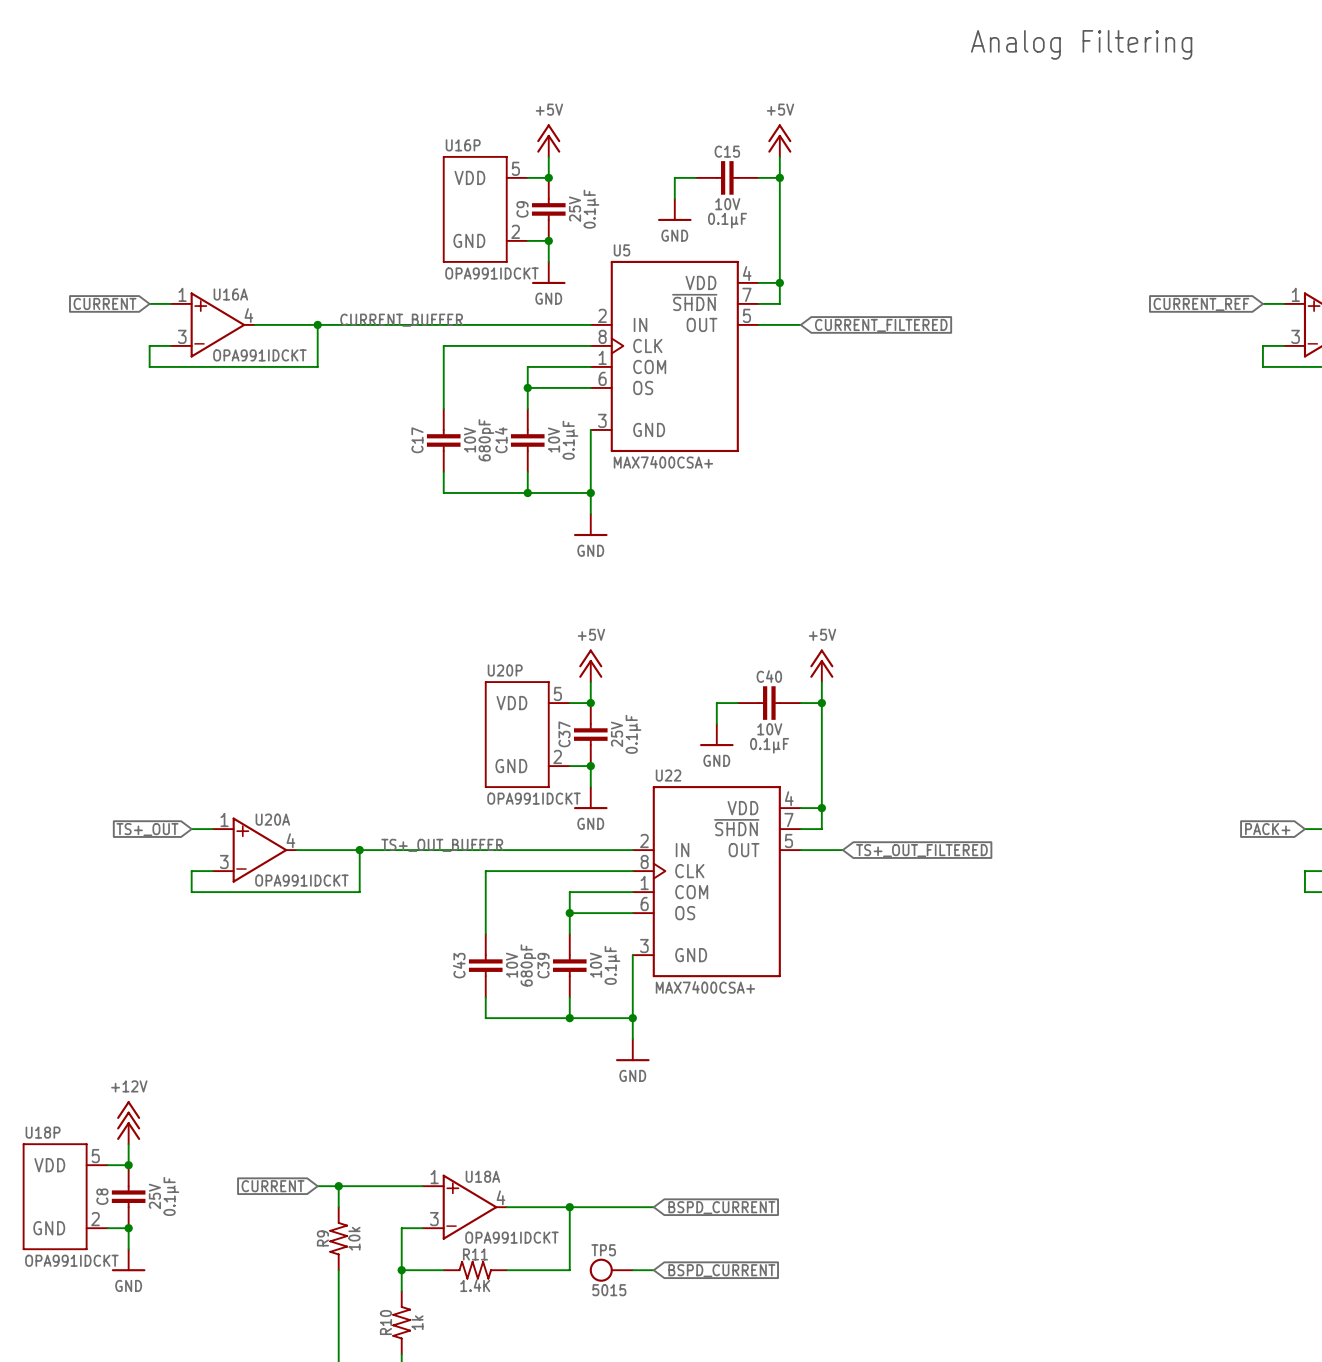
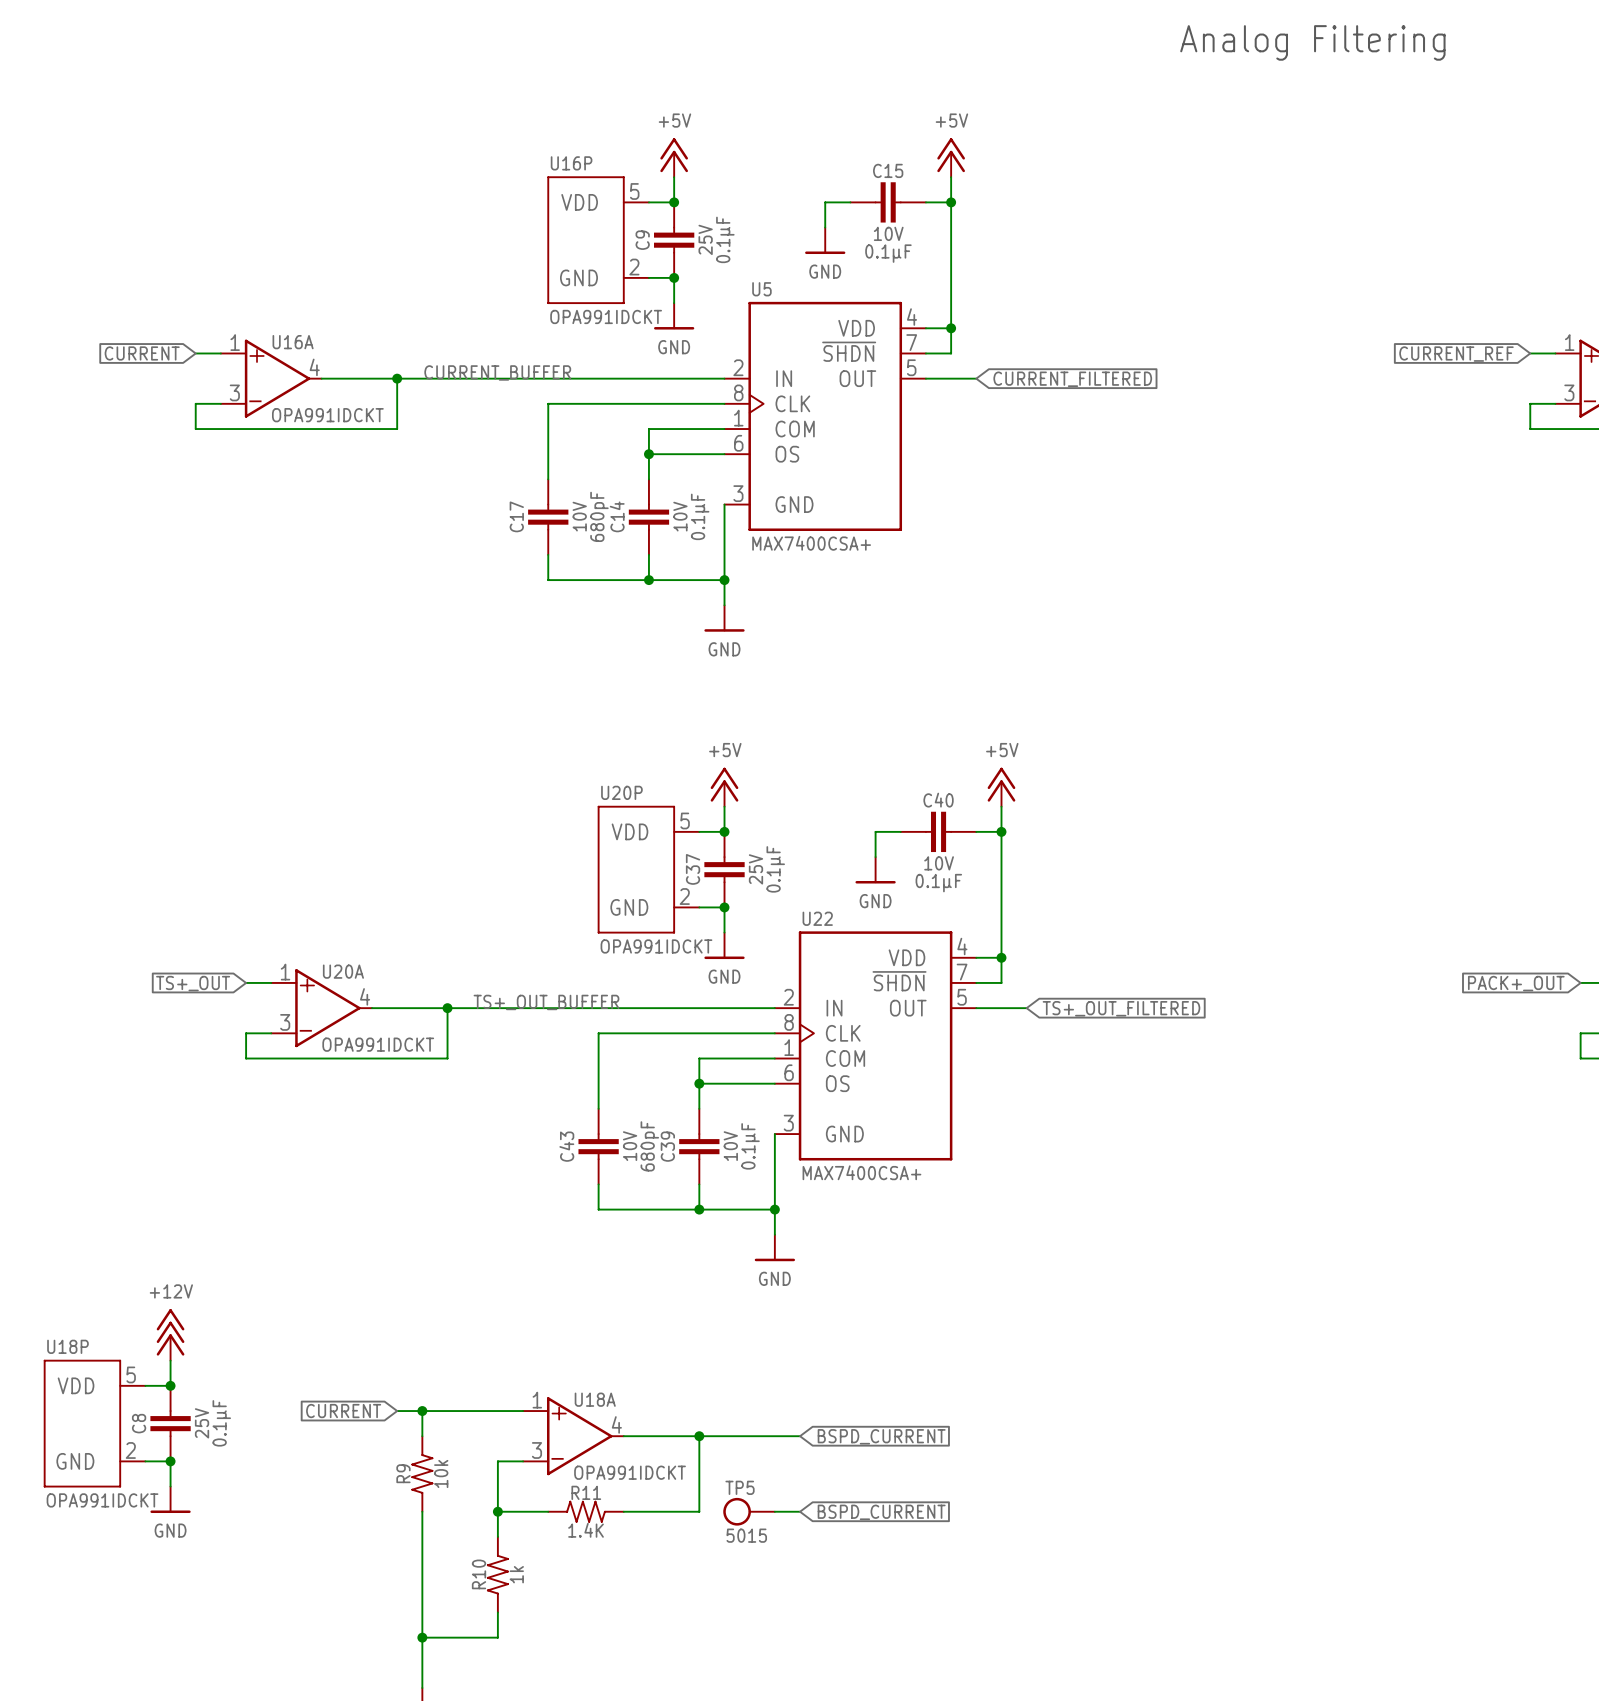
global label: PACK+ (1267, 829) -> PACK+_OUT (1516, 983)

